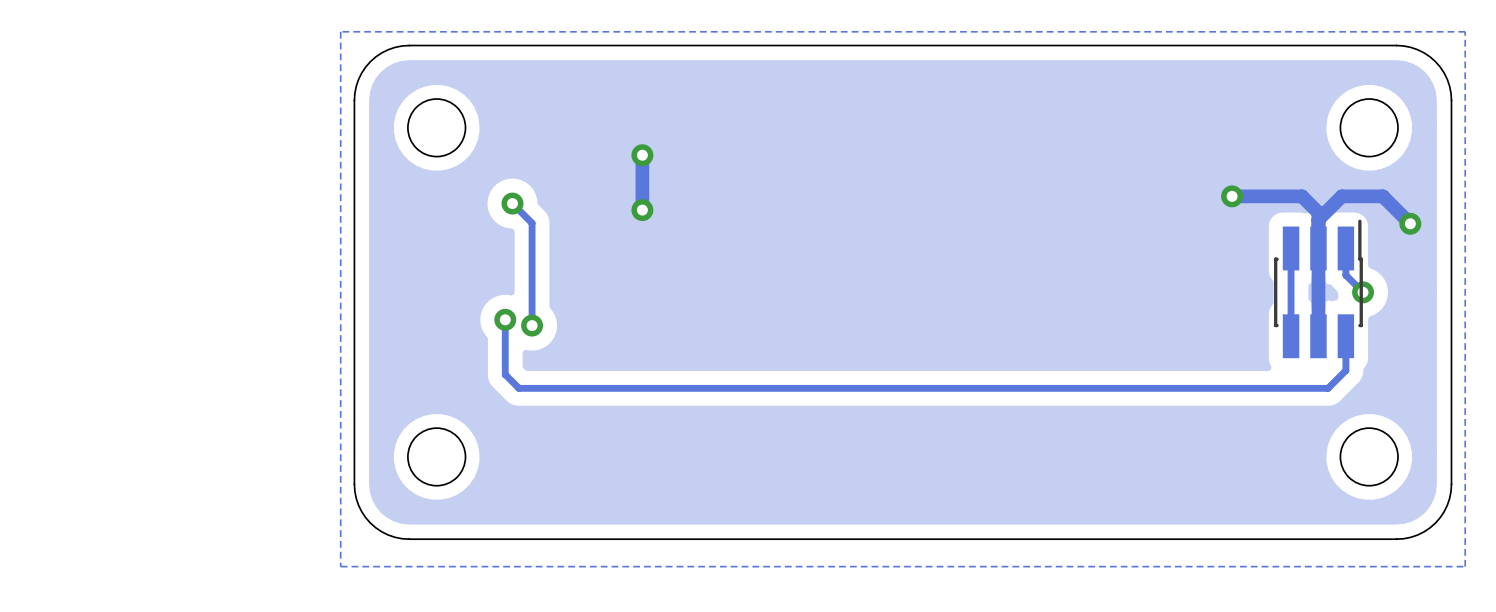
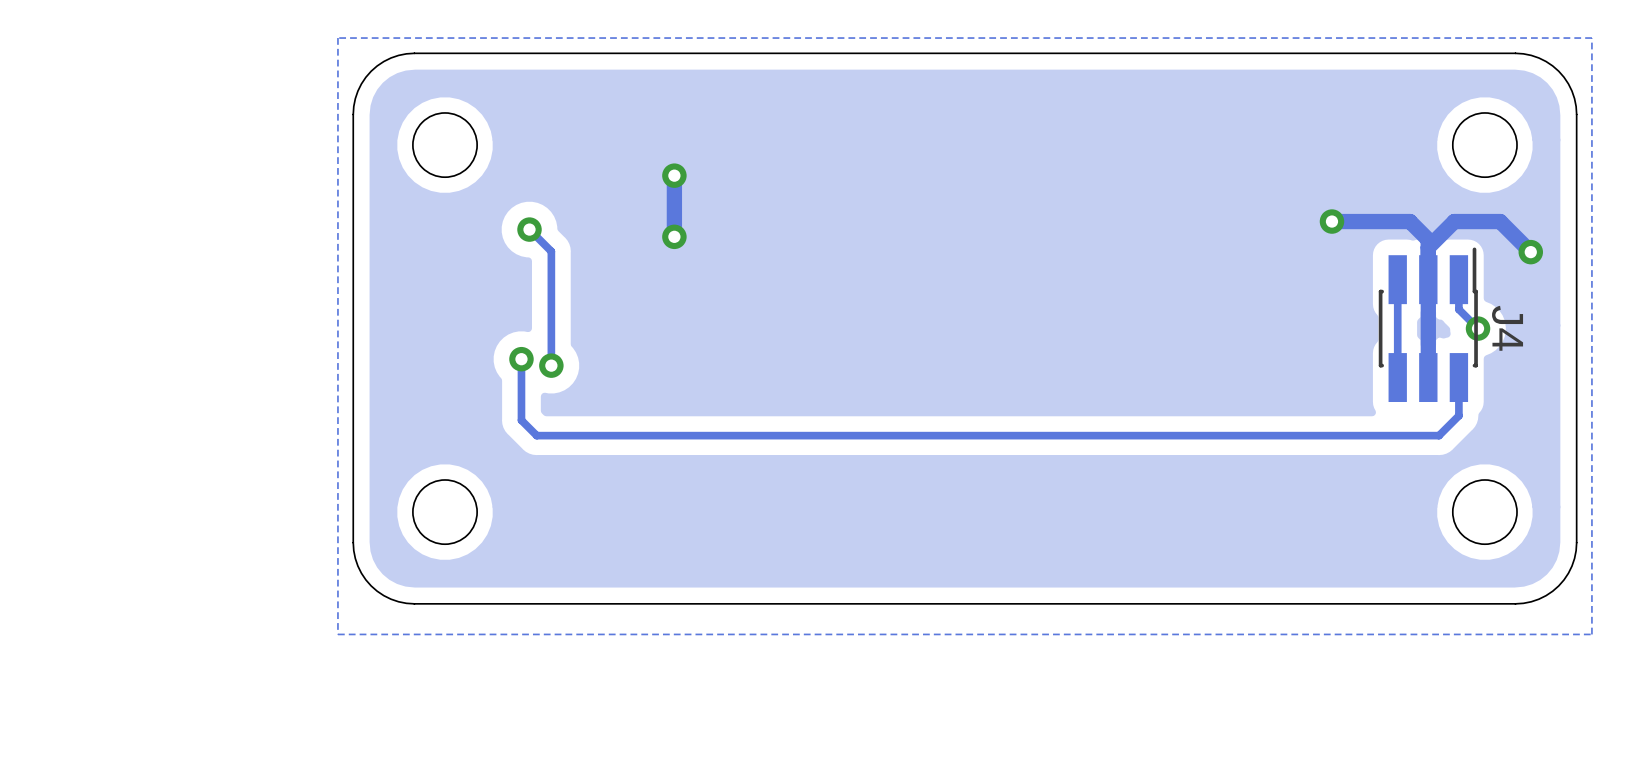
J4 name: none -> J4 (1507, 328)

